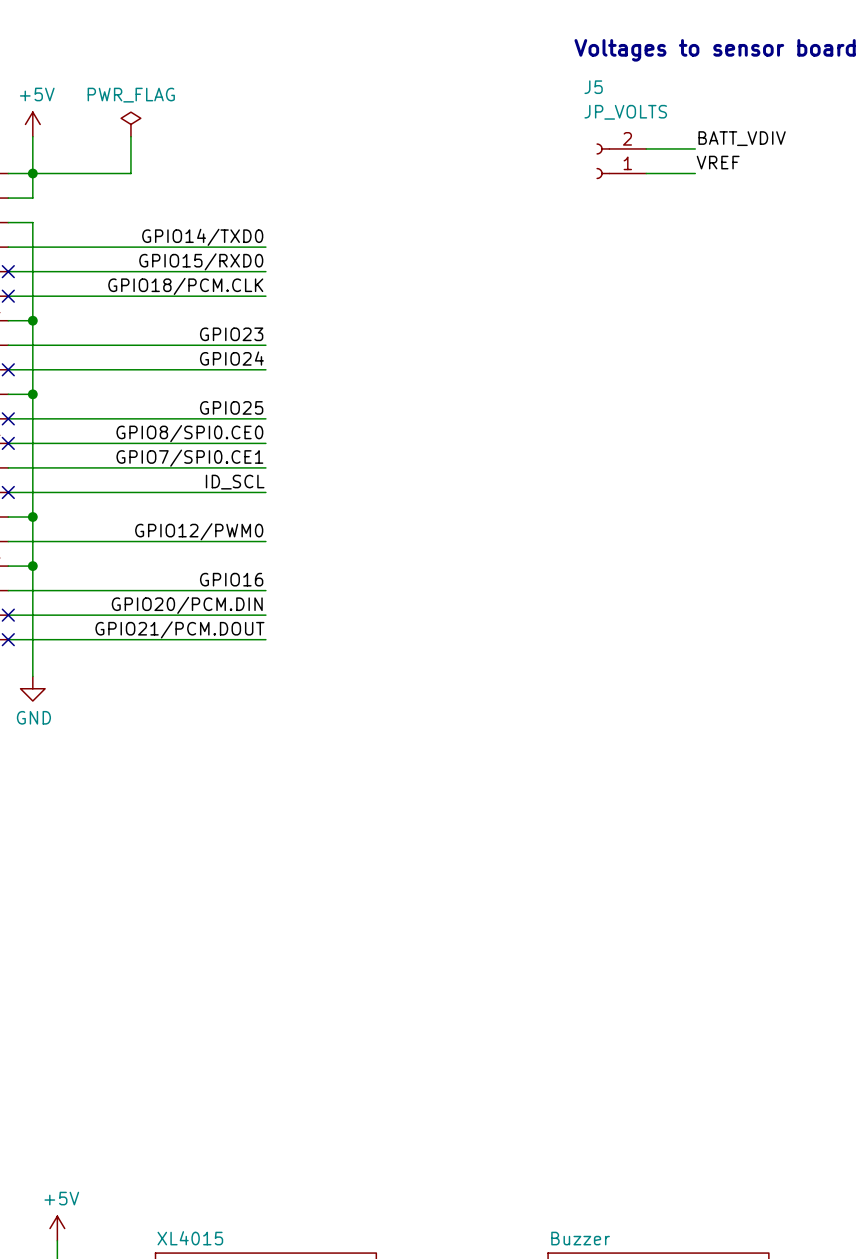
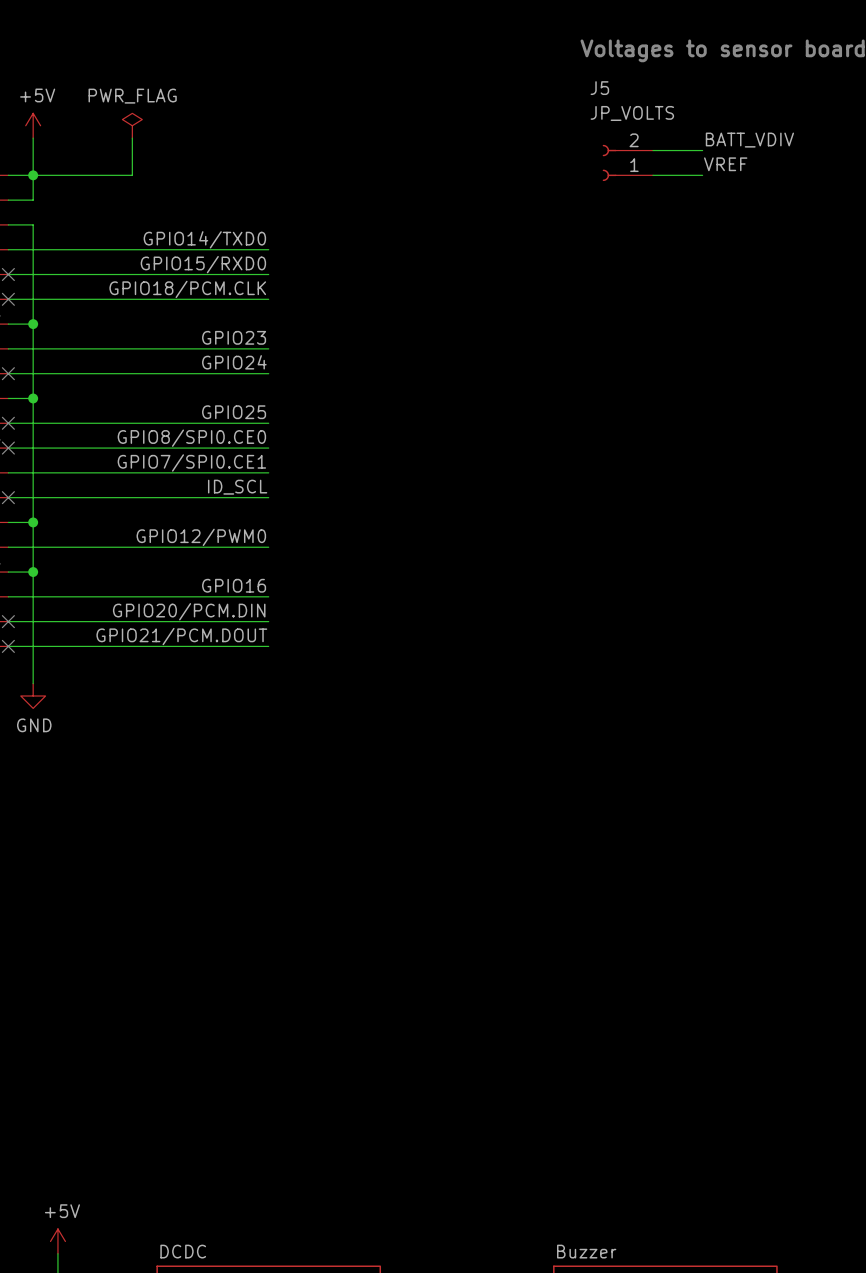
sheet XL4015 name: XL4015 (190, 1238) -> DCDC (183, 1251)

